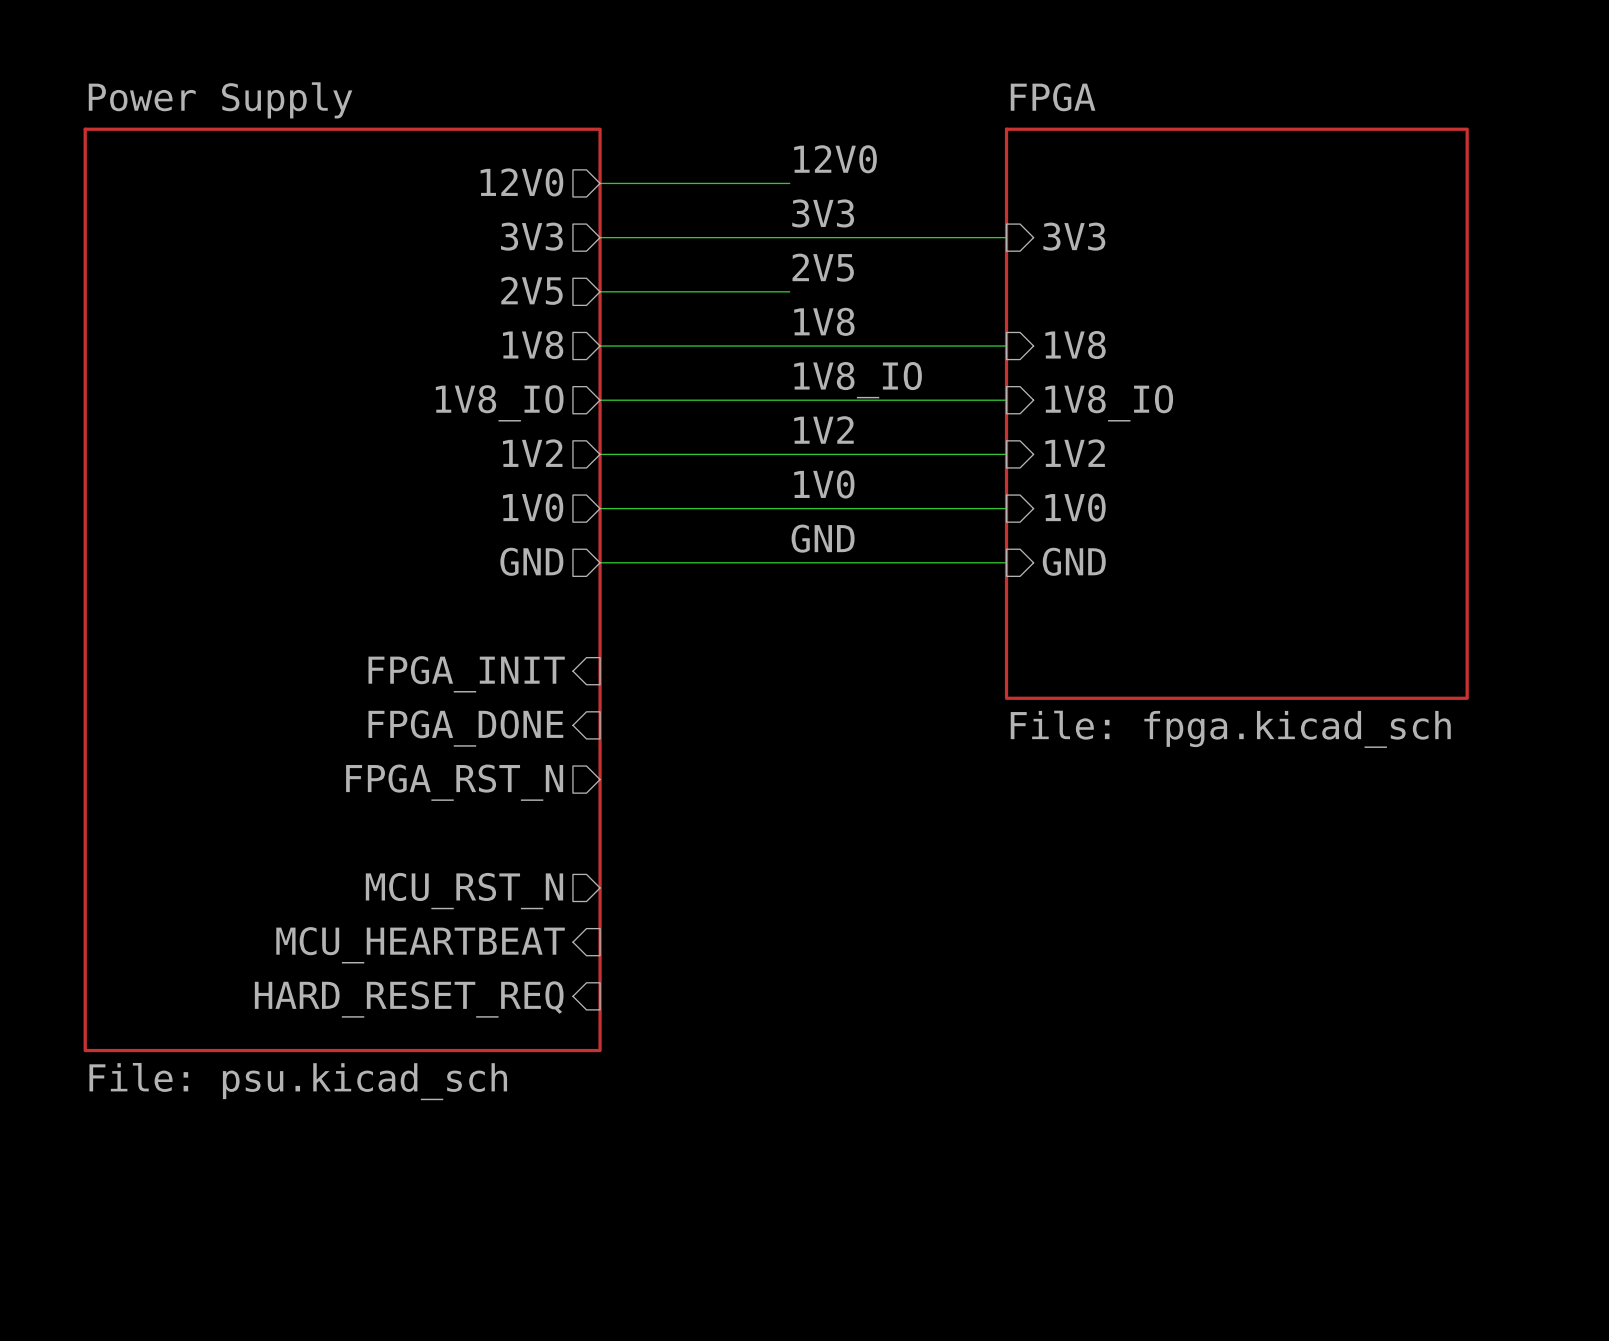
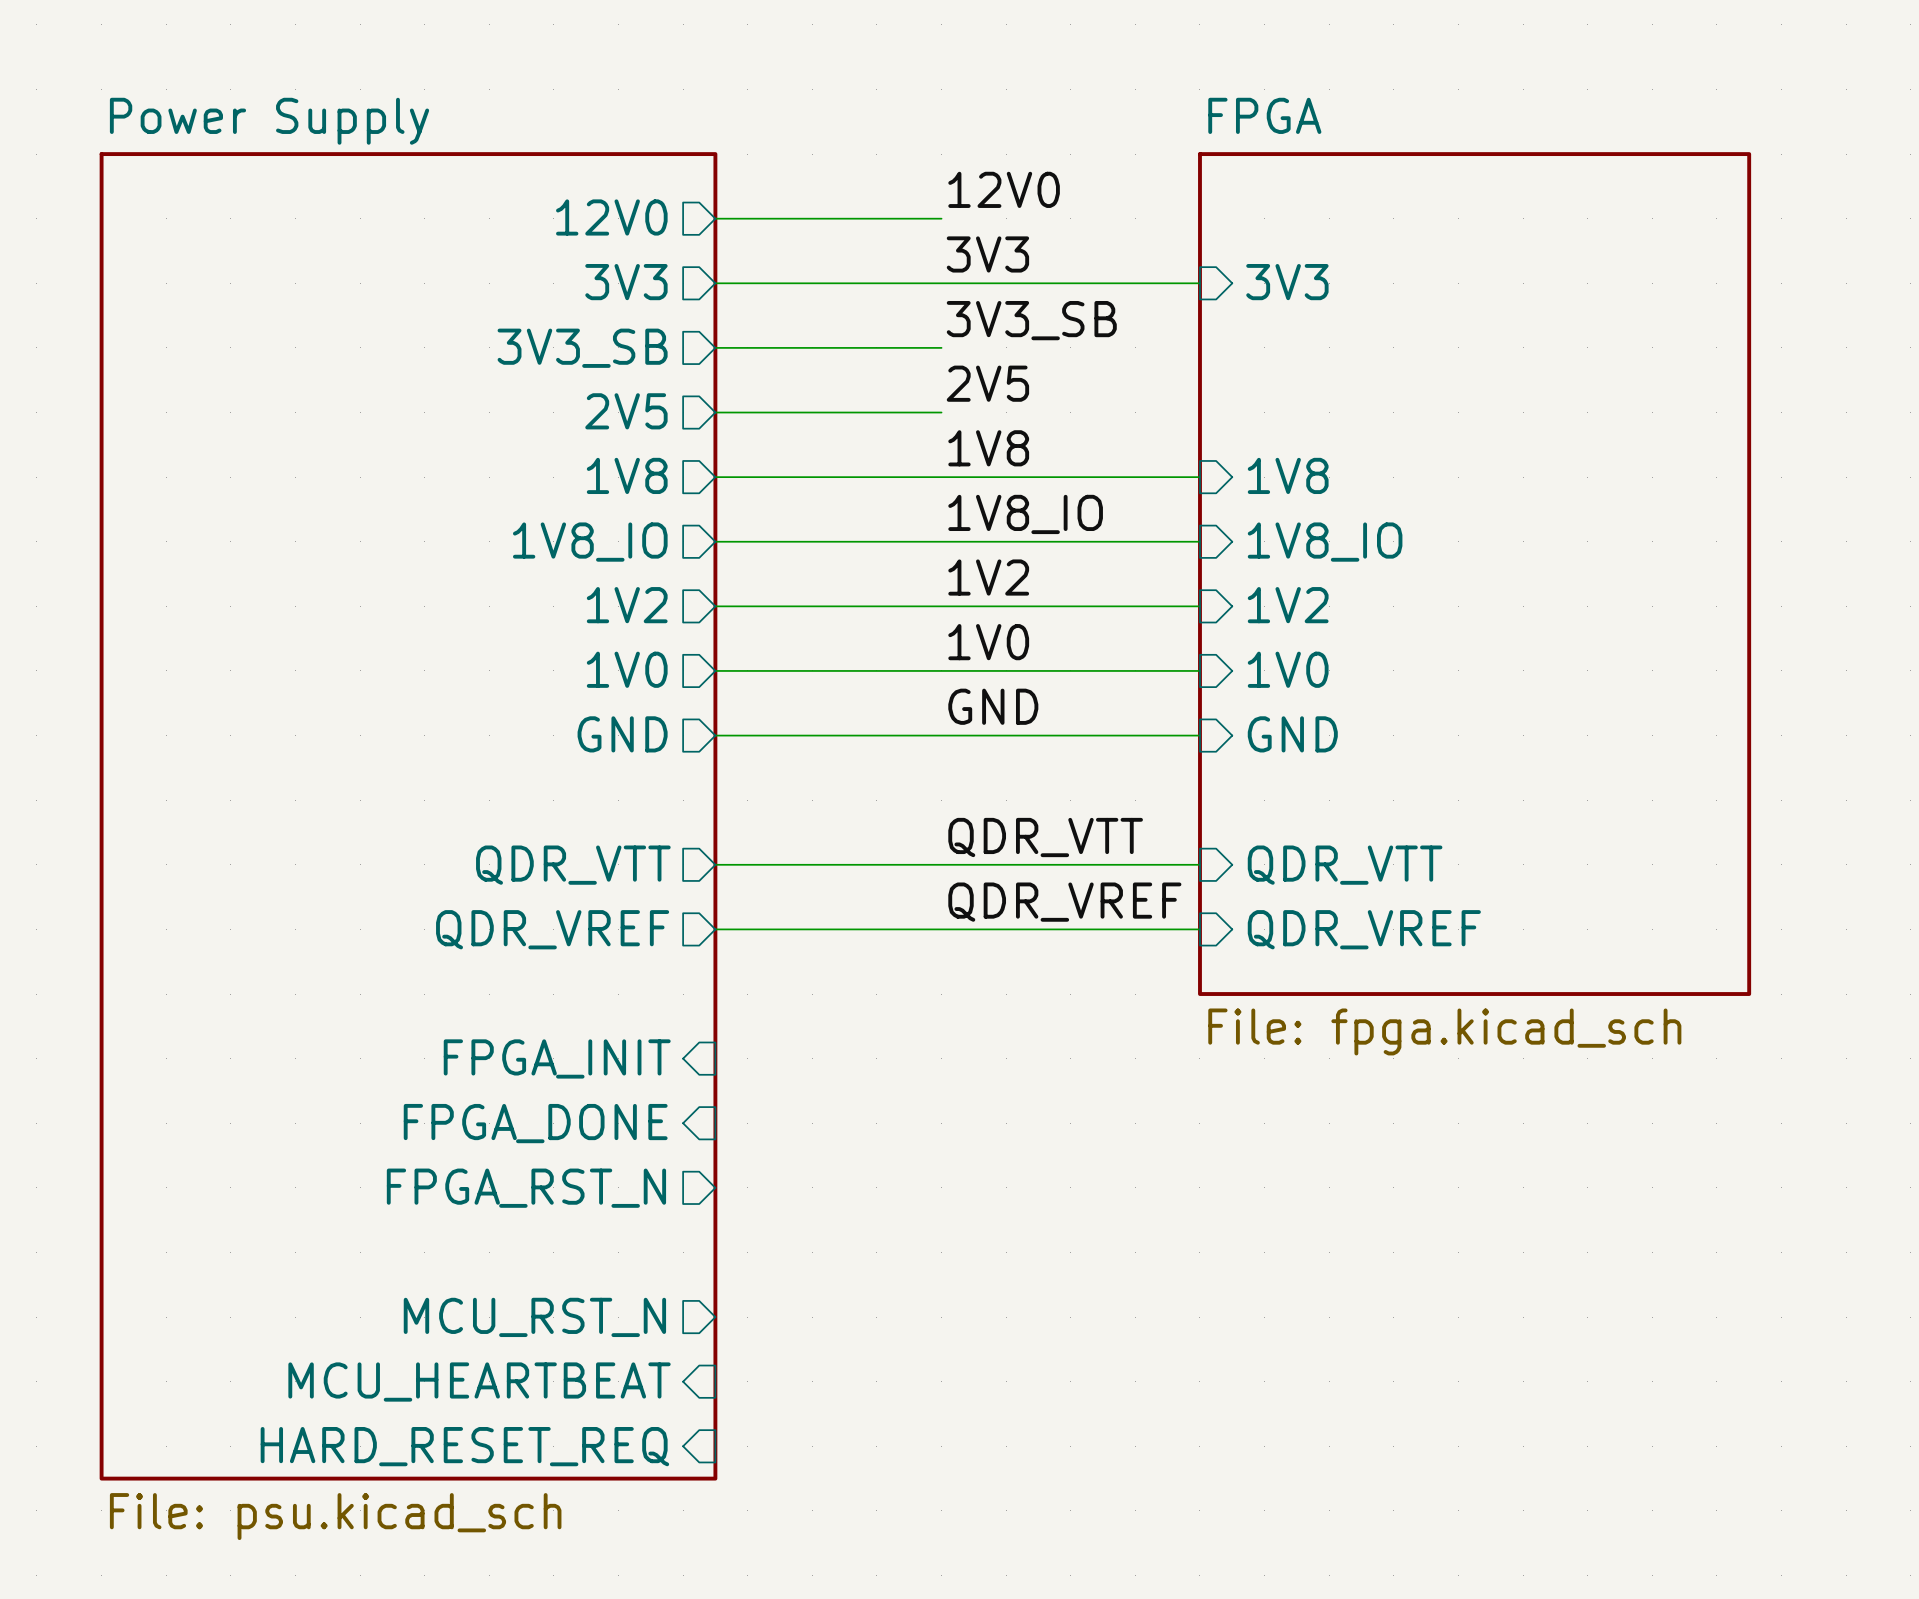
label: 2V5 (823, 267) -> 3V3_SB (1031, 320)
sheet pin: 2V5 (531, 290) -> 3V3_SB (582, 348)
label: 1V8 (824, 321) -> 2V5 (987, 383)
sheet pin: 1V8 (533, 345) -> 2V5 (626, 411)
sheet pin: 1V8 (1075, 345) -> none
wire: (789, 346) (1006, 346) -> none
label: 1V8_IO (858, 380) -> 1V8 (988, 448)
sheet pin: 1V8_IO (499, 403) -> 1V8 (627, 475)
sheet pin: 1V8_IO (1109, 403) -> 1V8 (1288, 475)
sheet FPGA: File: fpga.kicad_sch (1236, 413) -> none
label: 1V2 (823, 429) -> 1V8_IO (1025, 514)
sheet pin: 1V2 (532, 453) -> 1V8_IO (590, 542)
sheet pin: 1V2 (1075, 453) -> 1V8_IO (1325, 542)
sheet FPGA: none -> File: fpga.kicad_sch (1474, 574)
label: 1V0 (824, 484) -> 1V2 (988, 577)
sheet pin: 1V0 (533, 507) -> 1V2 (627, 605)
sheet pin: 1V0 (1075, 507) -> 1V2 (1288, 605)
label: GND (823, 538) -> 1V0 (988, 642)
sheet pin: GND (531, 561) -> 1V0 (627, 669)
sheet pin: GND (1074, 561) -> 1V0 (1288, 669)
sheet Power Supply: File: psu.kicad_sch (342, 589) -> none
label: none -> GND (993, 706)
sheet pin: none -> GND (622, 734)
sheet pin: none -> GND (1292, 734)
wire: none -> (715, 735) (1199, 735)
sheet pin: FPGA_INIT (466, 674) -> none
sheet Power Supply: none -> File: psu.kicad_sch (408, 816)
label: none -> QDR_VTT (1045, 837)
wire: none -> (715, 864) (1199, 864)
sheet pin shape: input (465, 728) -> output (573, 865)
sheet pin: FPGA_DONE (465, 728) -> QDR_VTT (573, 865)
sheet pin: none -> QDR_VTT (1345, 865)
label: none -> QDR_VREF (1064, 902)
wire: none -> (715, 929) (1199, 929)
sheet pin: FPGA_RST_N (454, 782) -> QDR_VREF (552, 929)
sheet pin: none -> QDR_VREF (1364, 929)
sheet pin shape: output (464, 891) -> input (557, 1058)
sheet pin: MCU_RST_N (464, 891) -> FPGA_INIT (557, 1058)
sheet pin: MCU_HEARTBEAT (420, 945) -> FPGA_DONE (535, 1123)
sheet pin shape: input (409, 999) -> output (526, 1188)
sheet pin: HARD_RESET_REQ (409, 999) -> FPGA_RST_N (526, 1188)
sheet pin: none -> MCU_RST_N (534, 1317)
sheet pin: none -> MCU_HEARTBEAT (479, 1382)
sheet pin: none -> HARD_RESET_REQ (464, 1446)

